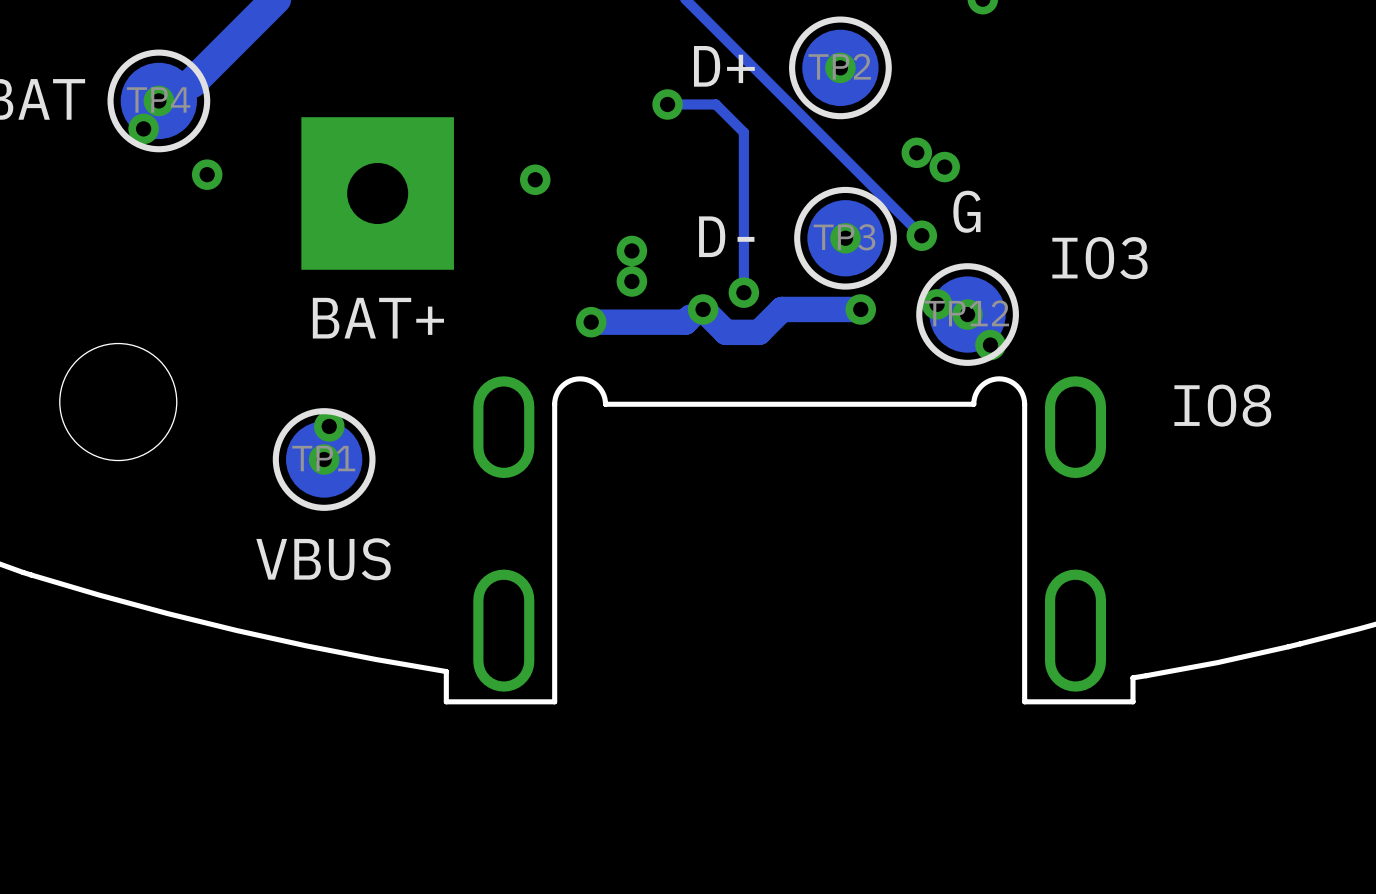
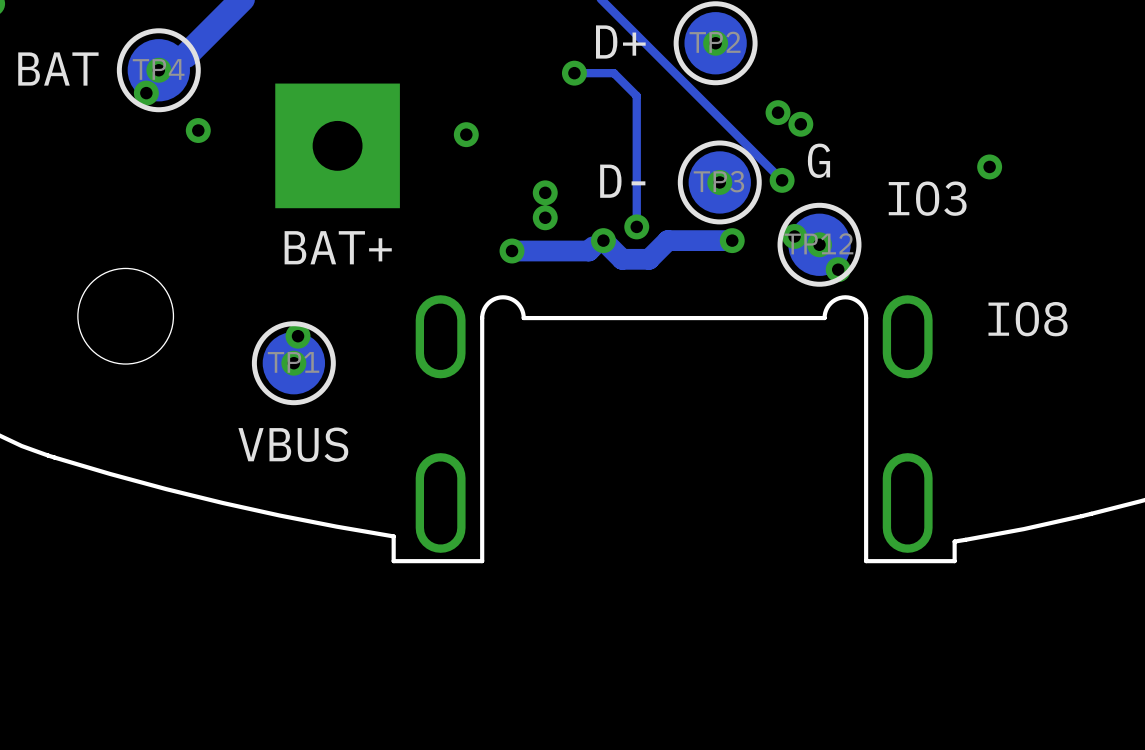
via: none -> (989, 166)

